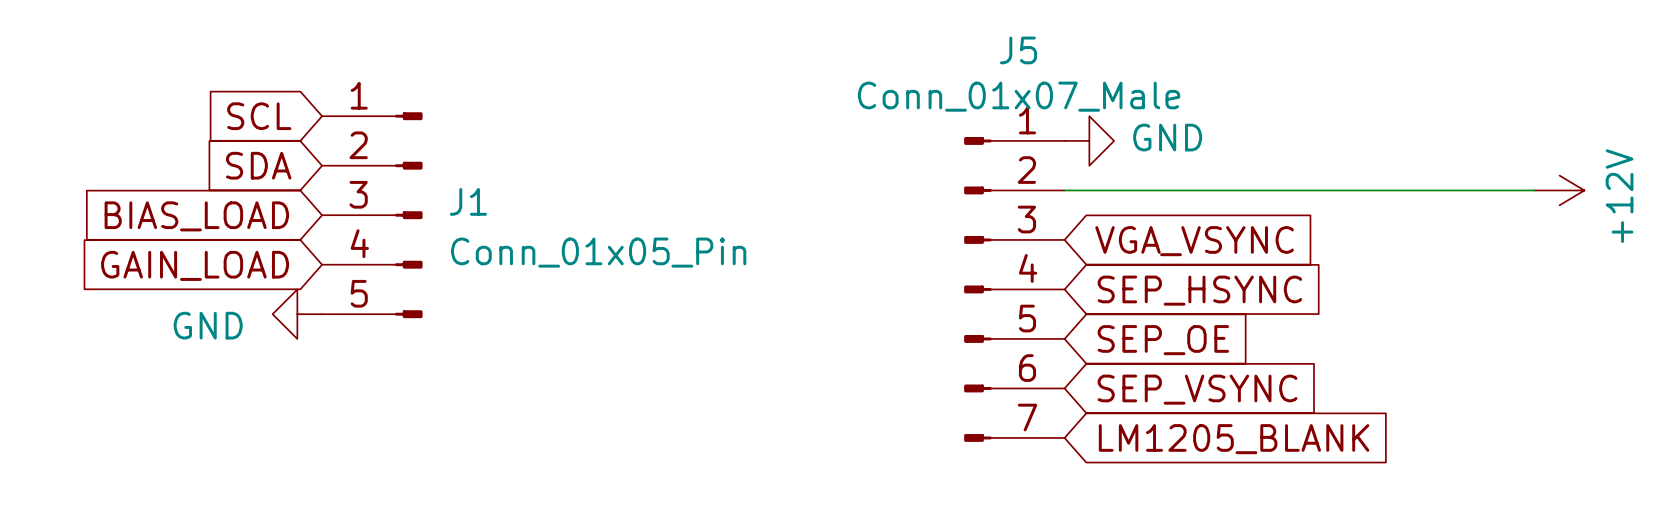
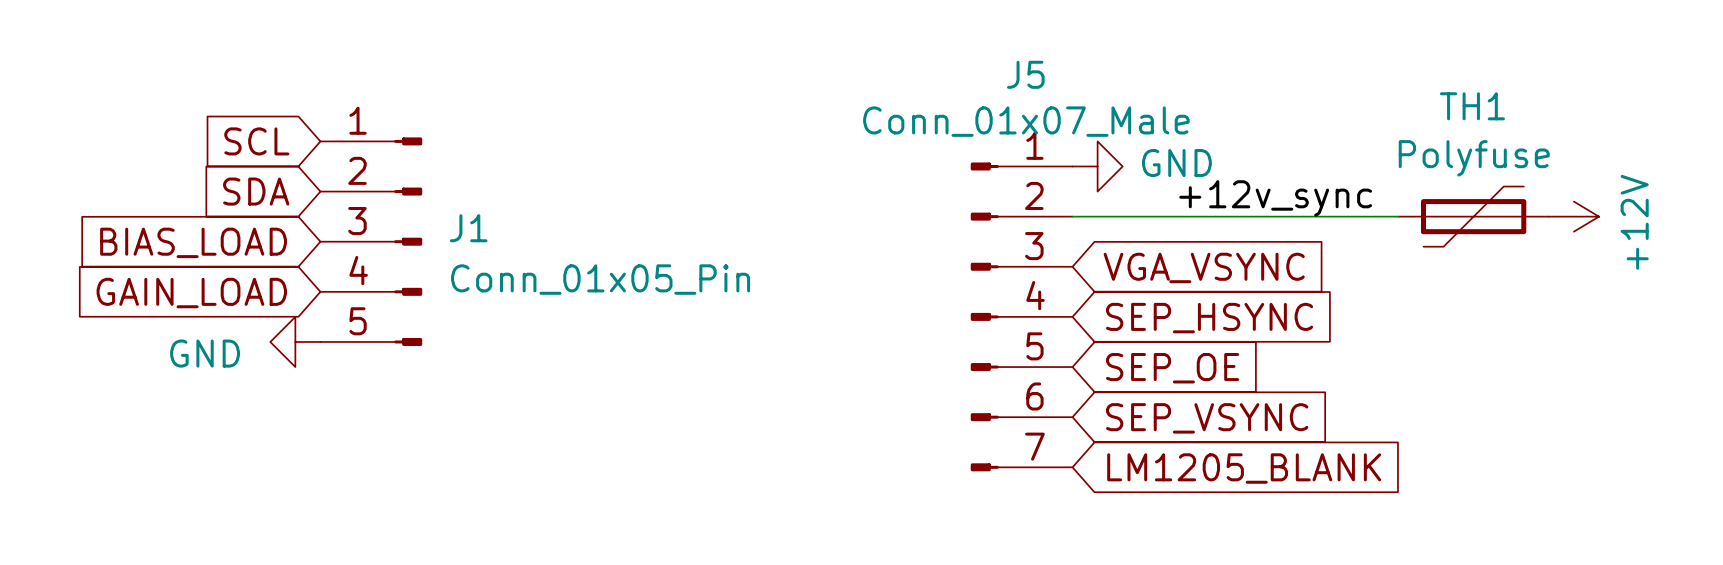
label: none -> +12v_sync (1275, 198)
TH1: none -> Polyfuse (1473, 216)

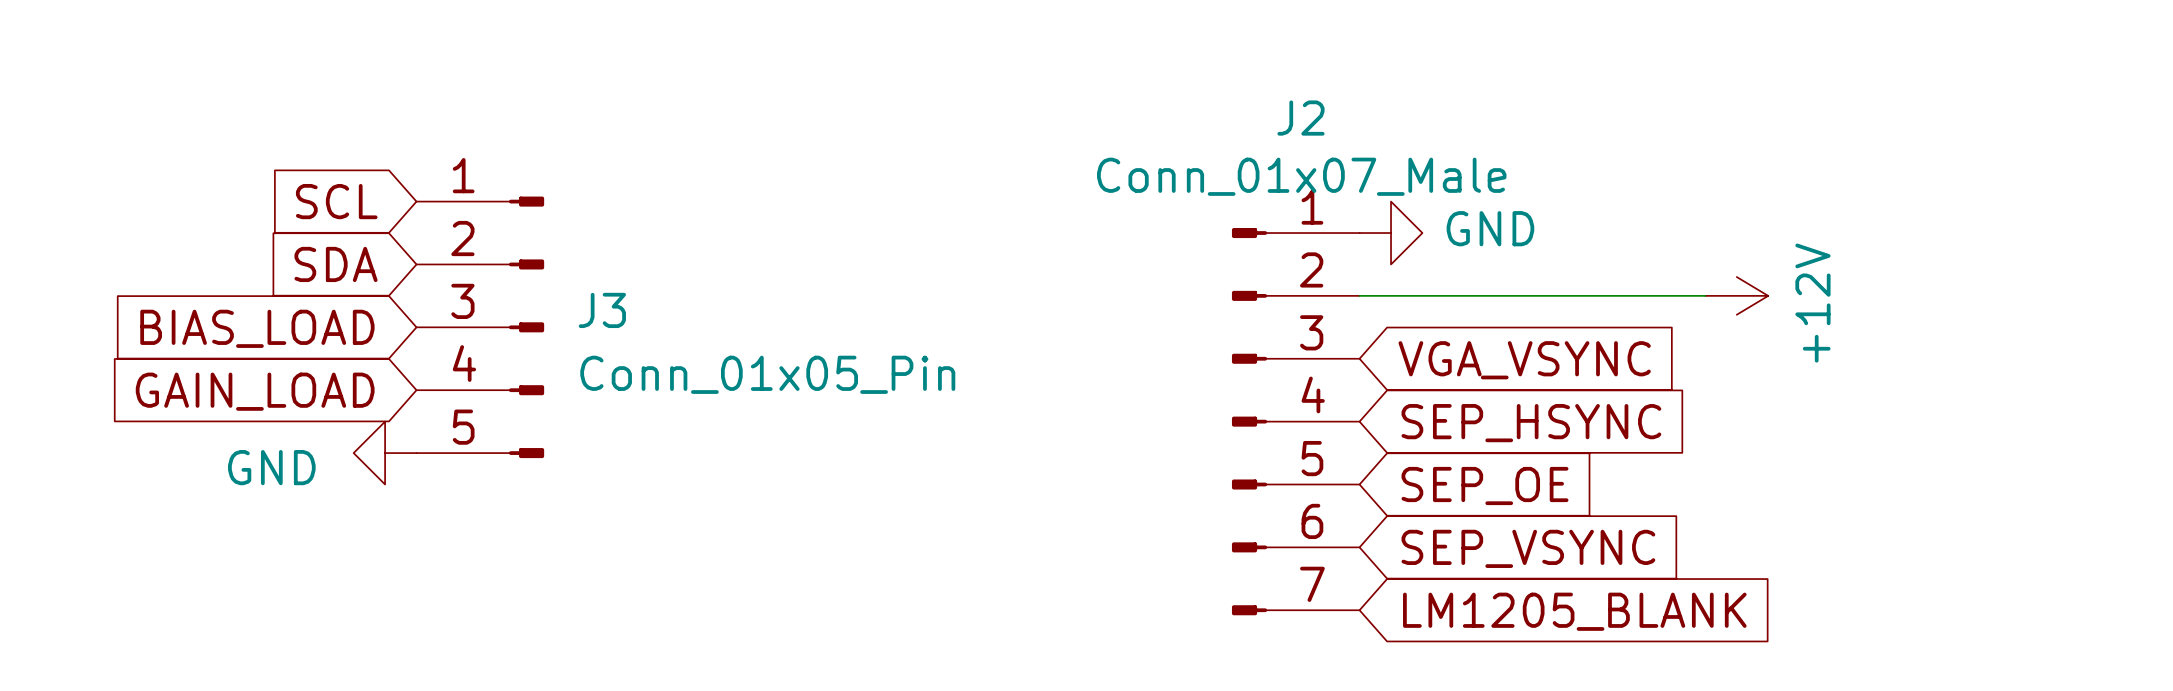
J5 name: J5 (1025, 74) -> J2 (1300, 118)
label: +12v_sync (1275, 198) -> none
TH1: Polyfuse (1473, 216) -> none
power symbol position: +12V (1573, 216) -> +12V (1736, 295)
J1 name: J1 (468, 228) -> J3 (602, 310)

